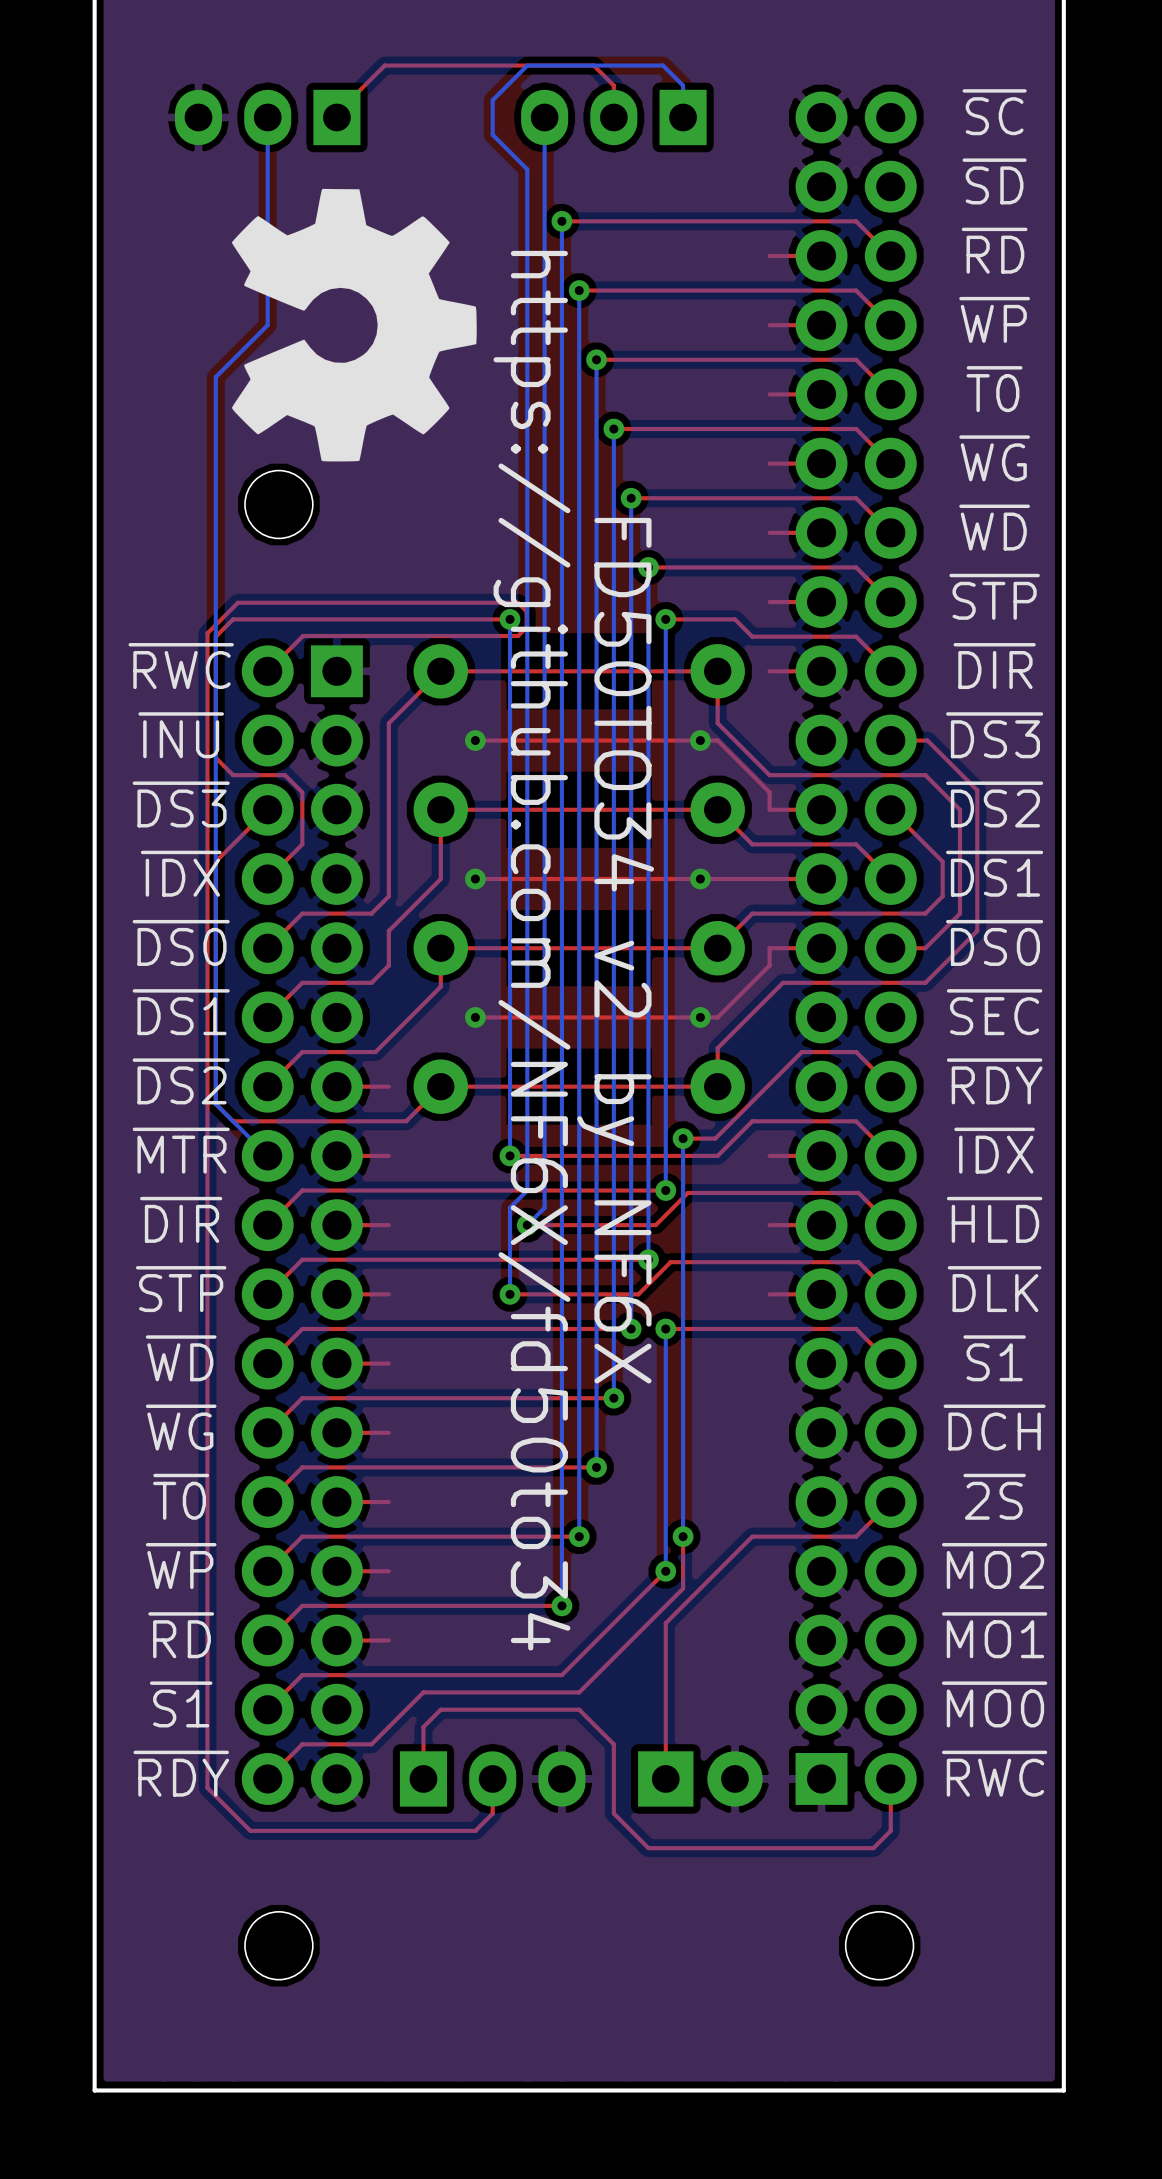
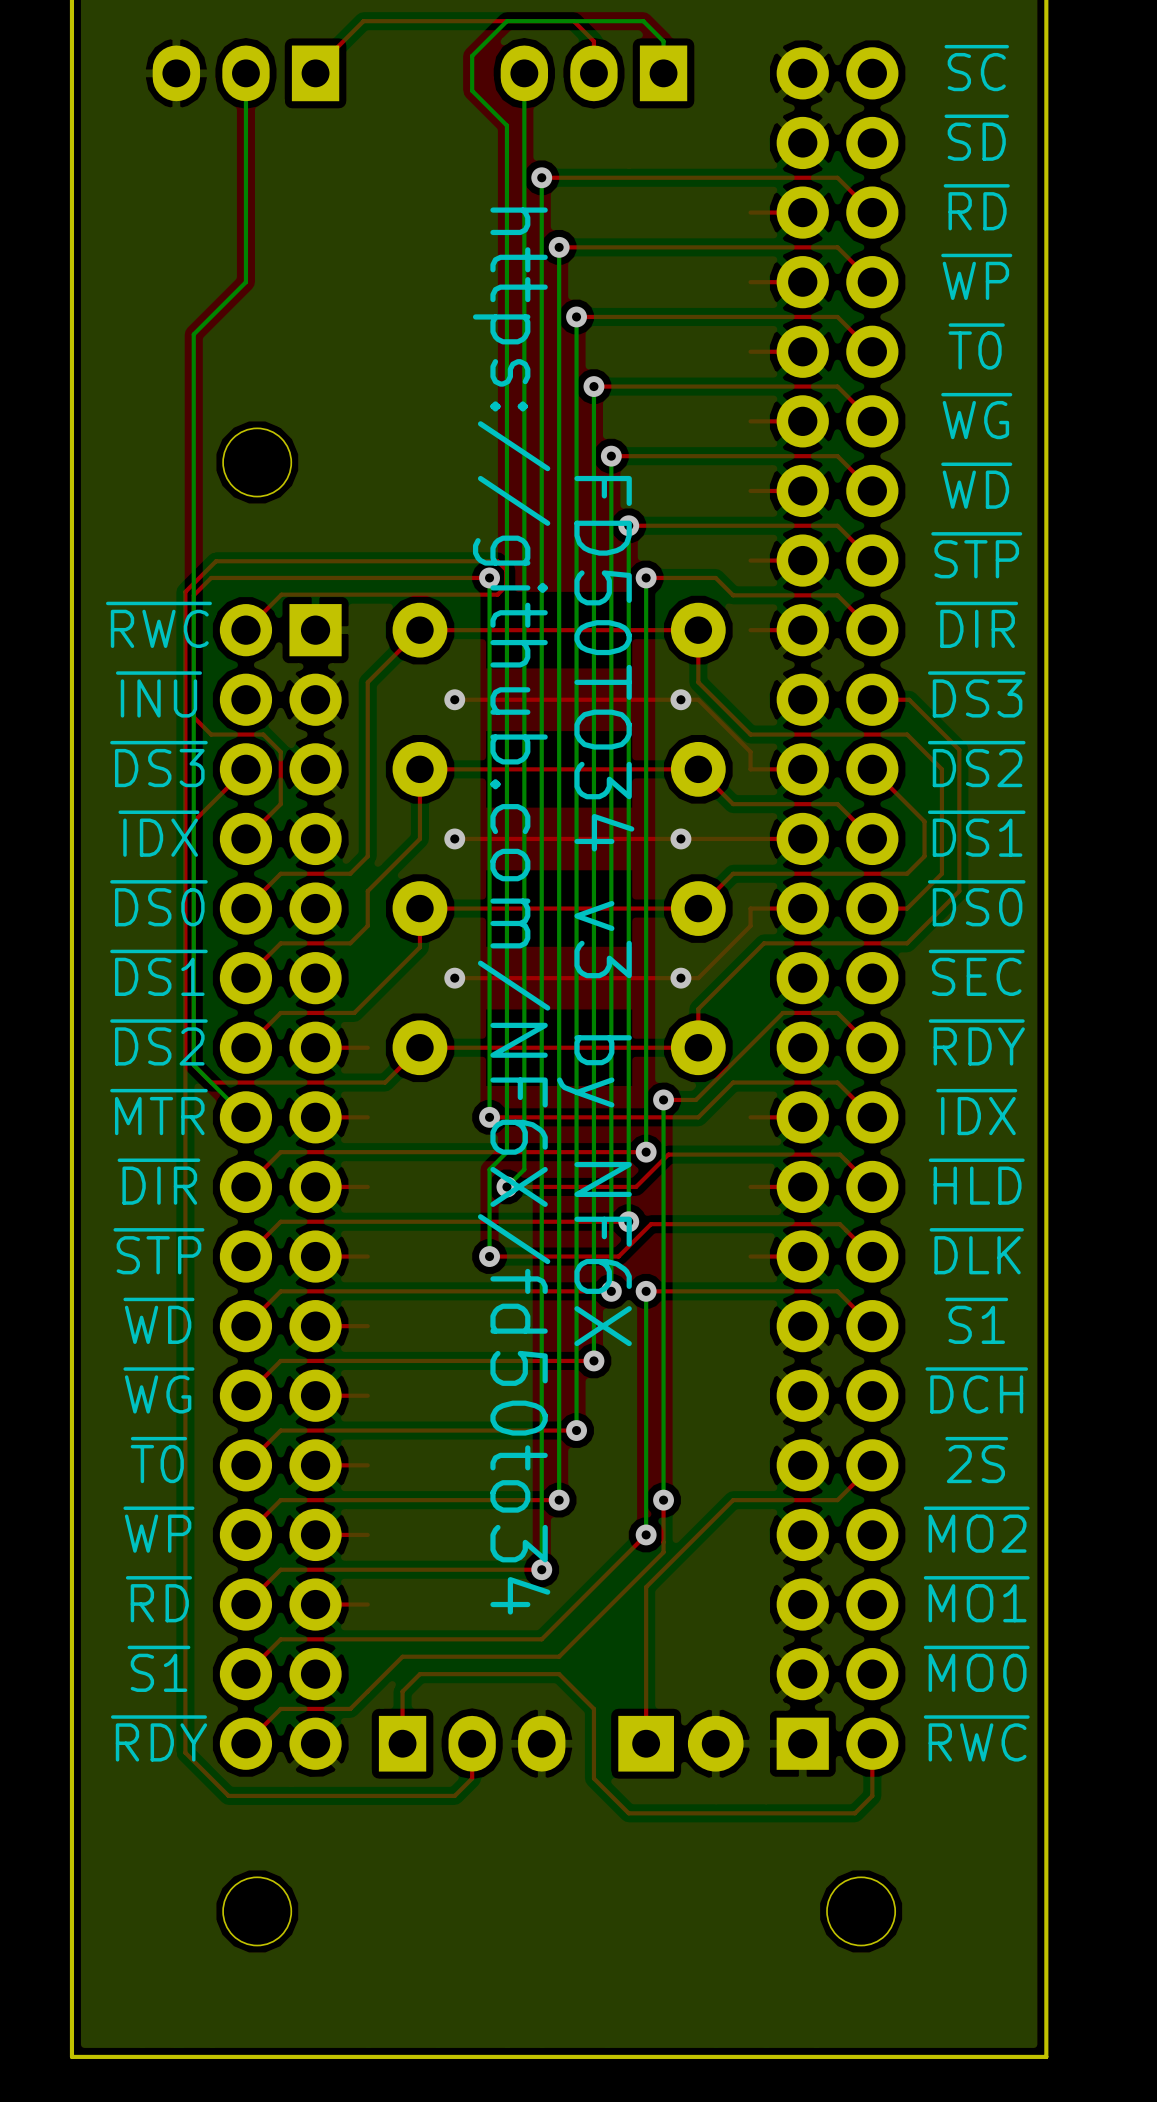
drawing: [231, 188, 477, 462] -> none
text: FD50TO34 v2 by NF6X (615, 950) -> FD50TO34 v3 by NF6X (595, 911)

